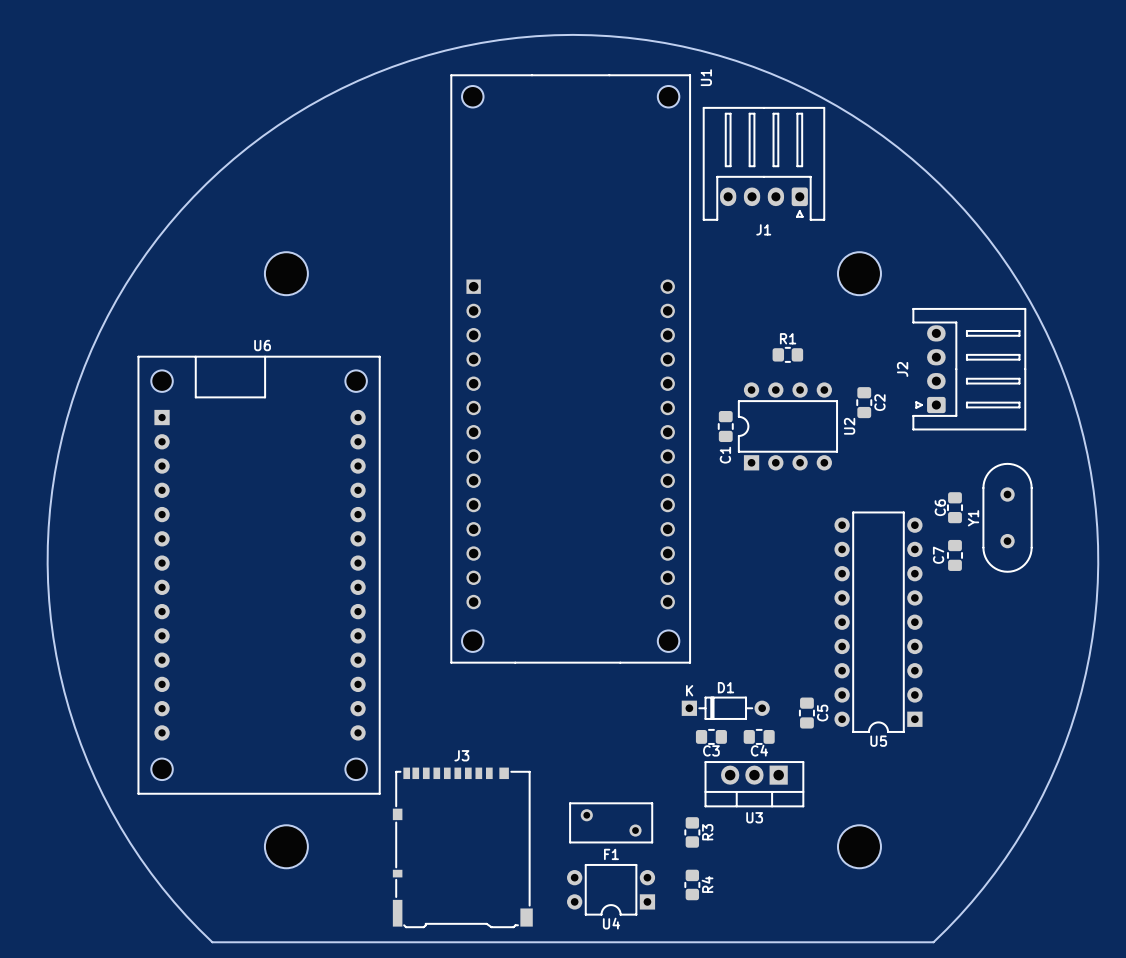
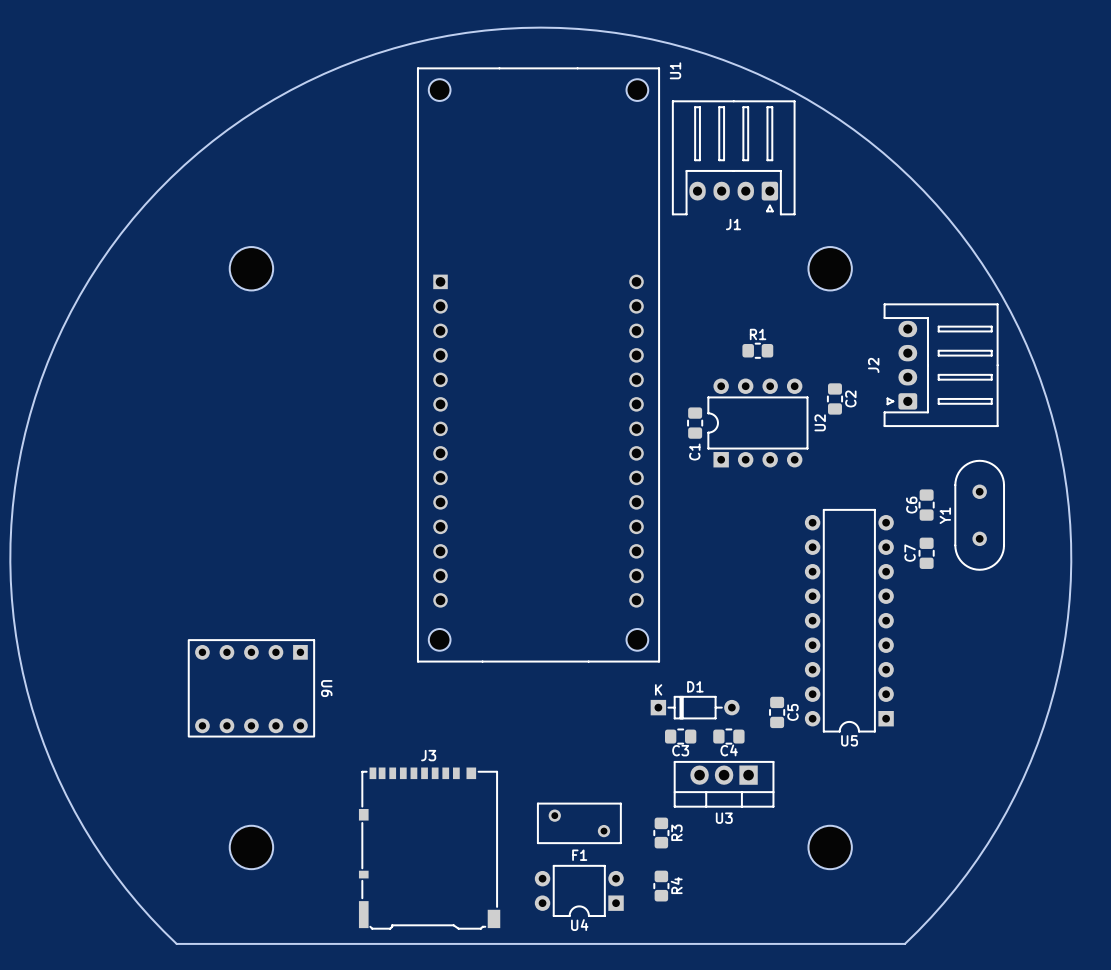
U6 name position: U6 (262, 345) -> U6 (326, 688)
U6 footprint: [137, 356, 381, 795] -> [188, 639, 315, 738]

